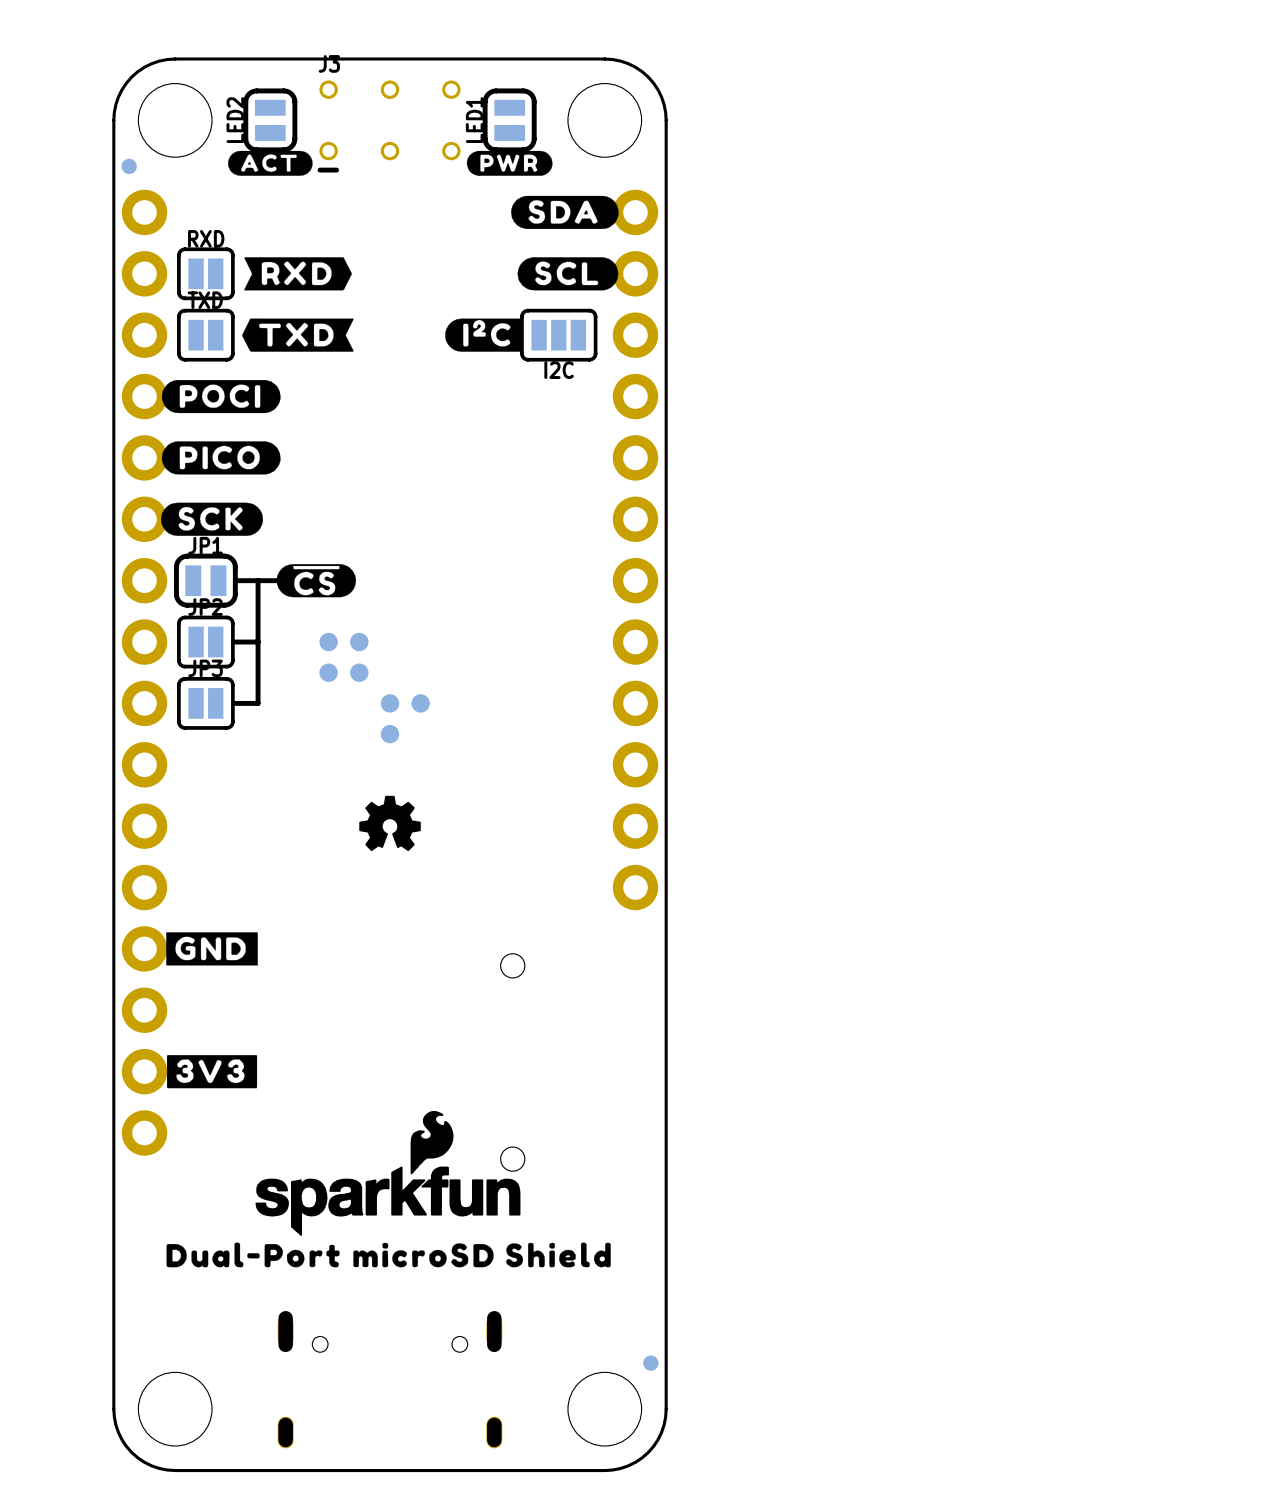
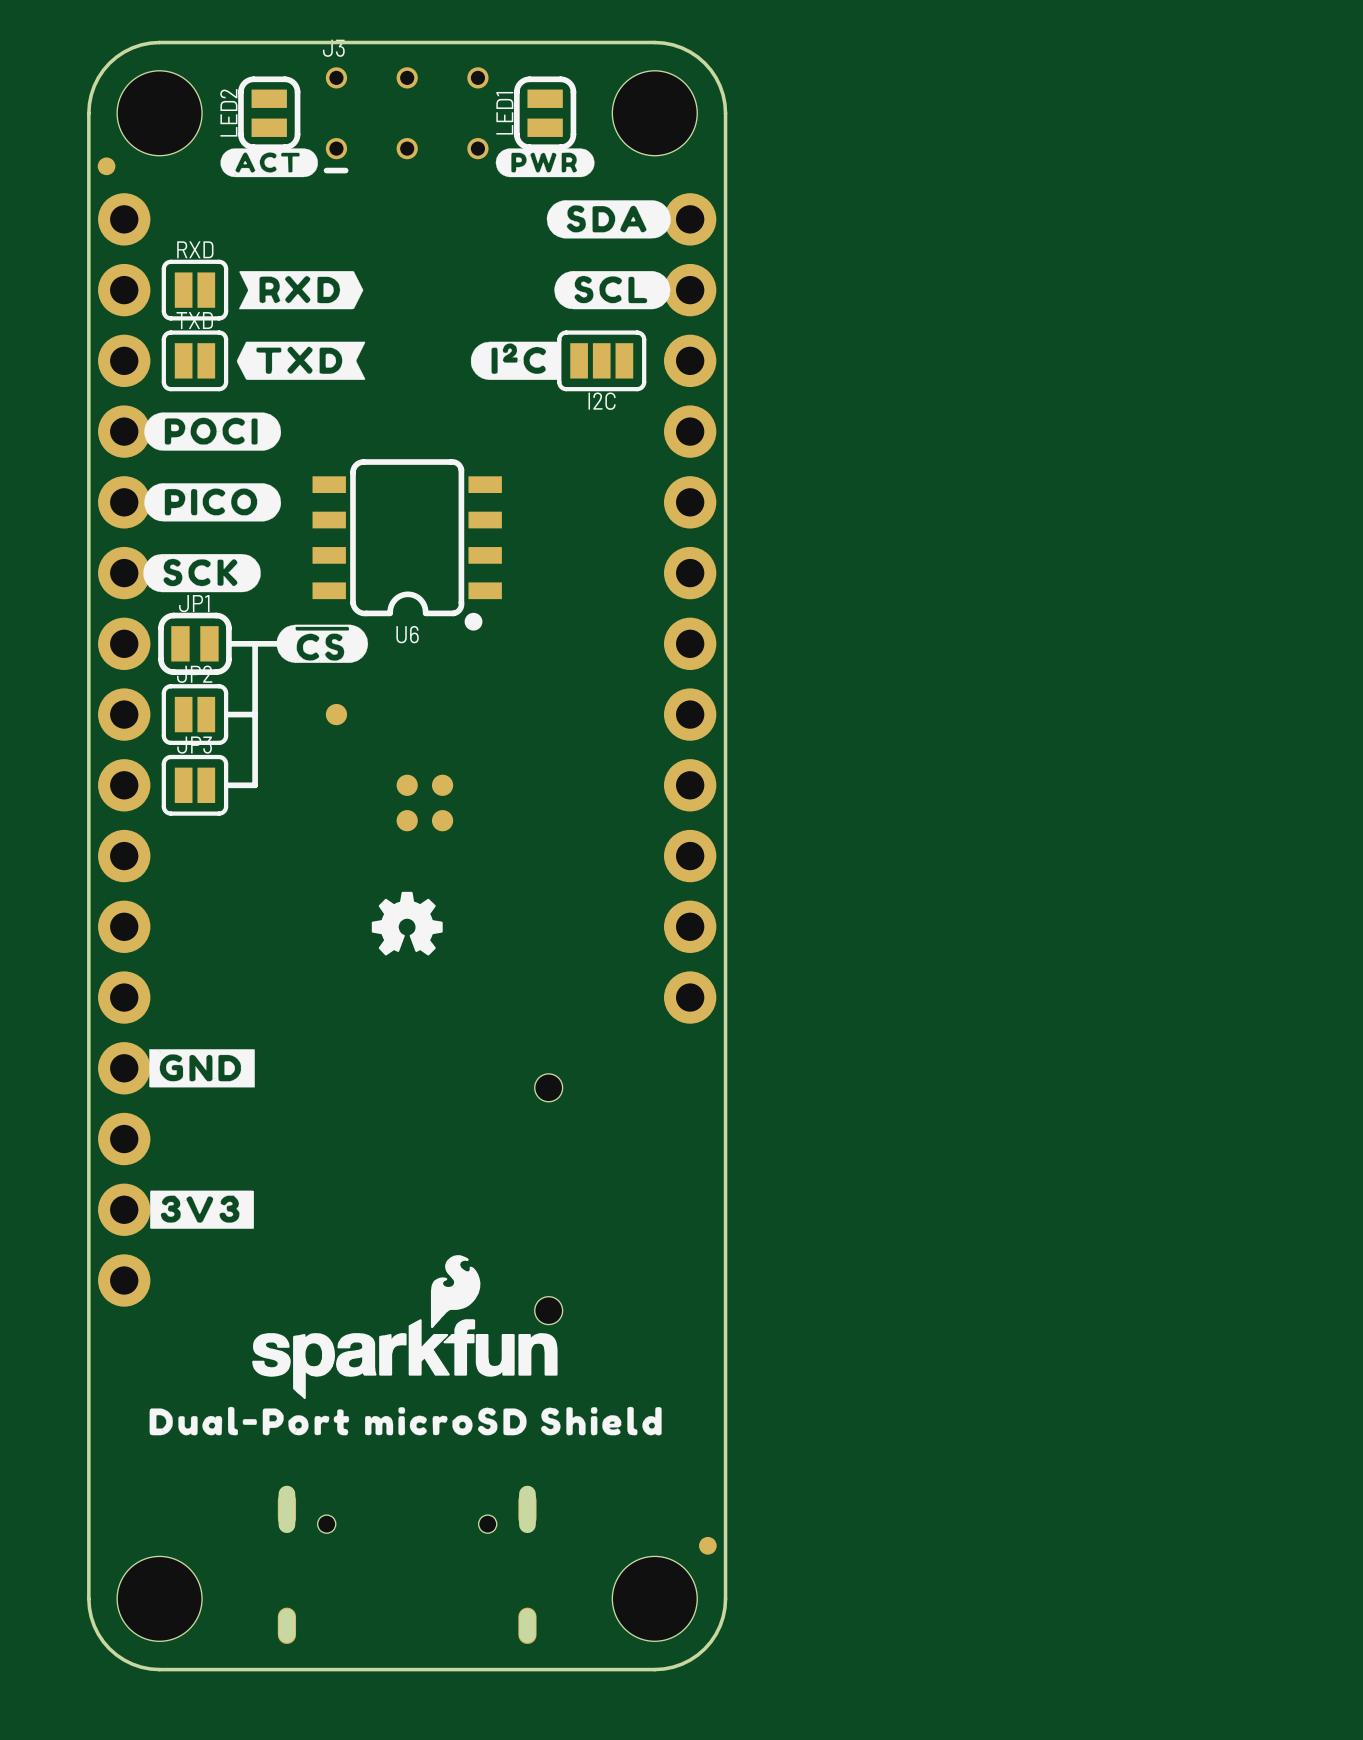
U6: none -> (407, 544)
part: (359, 642) -> none
part: (328, 672) -> none
part: (359, 672) -> none
part: none -> (442, 820)

